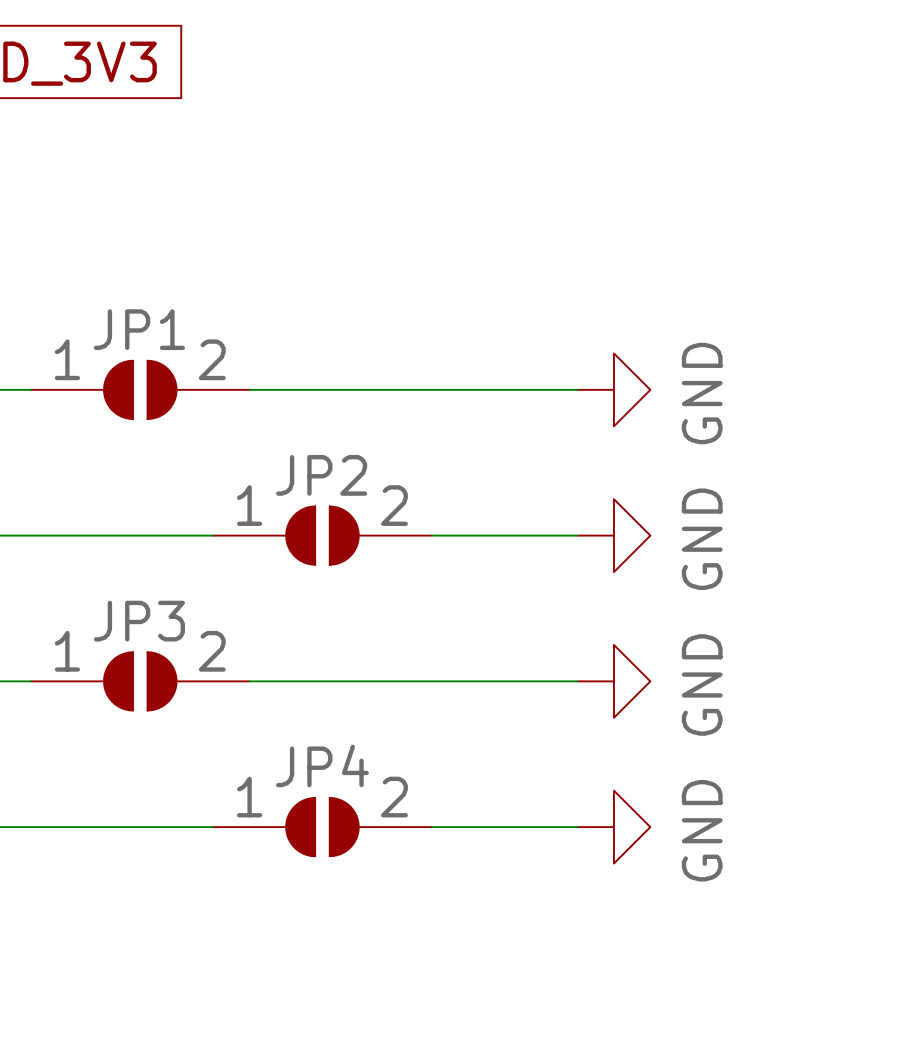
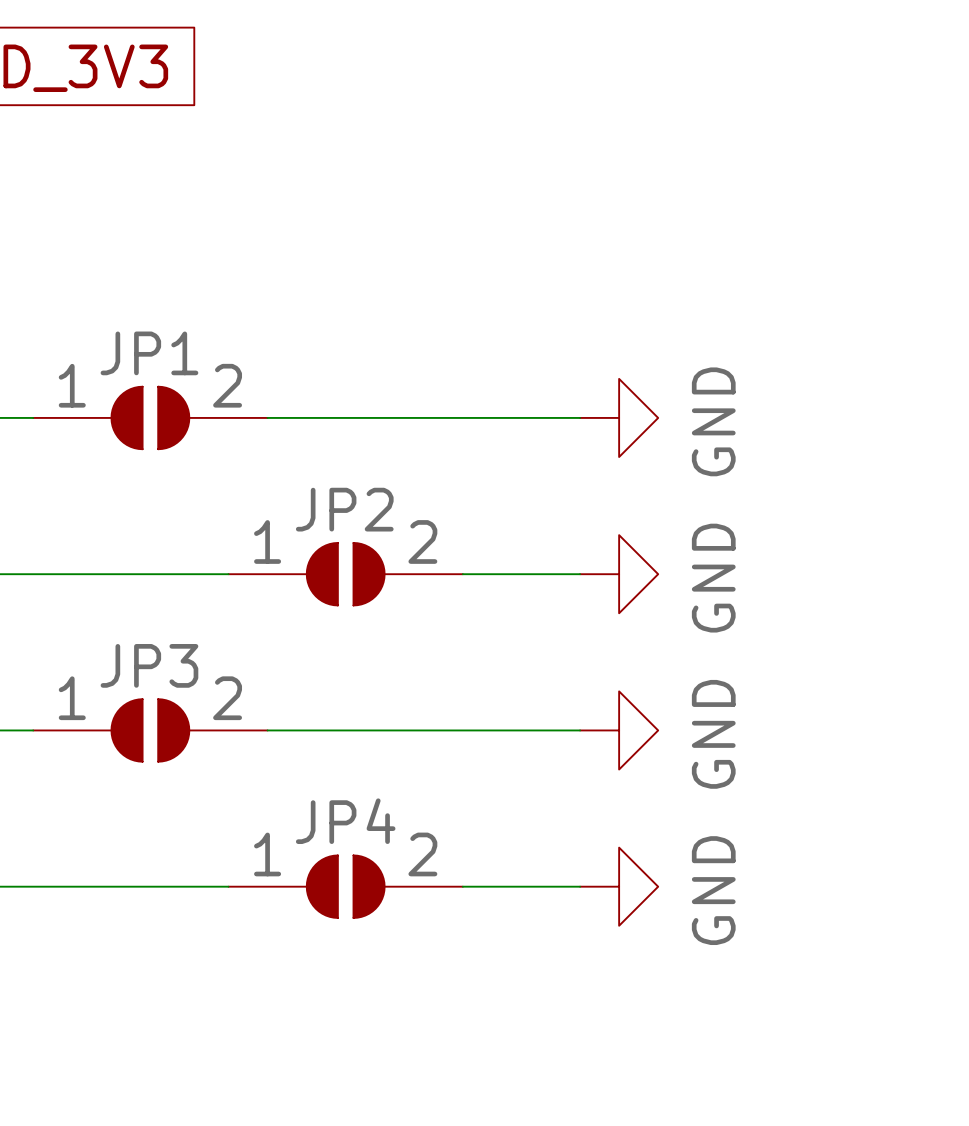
power symbol position: GND (613, 389) -> GND (619, 417)
power symbol position: GND (613, 535) -> GND (619, 574)
power symbol position: GND (613, 681) -> GND (619, 730)
power symbol position: GND (613, 827) -> GND (619, 886)

